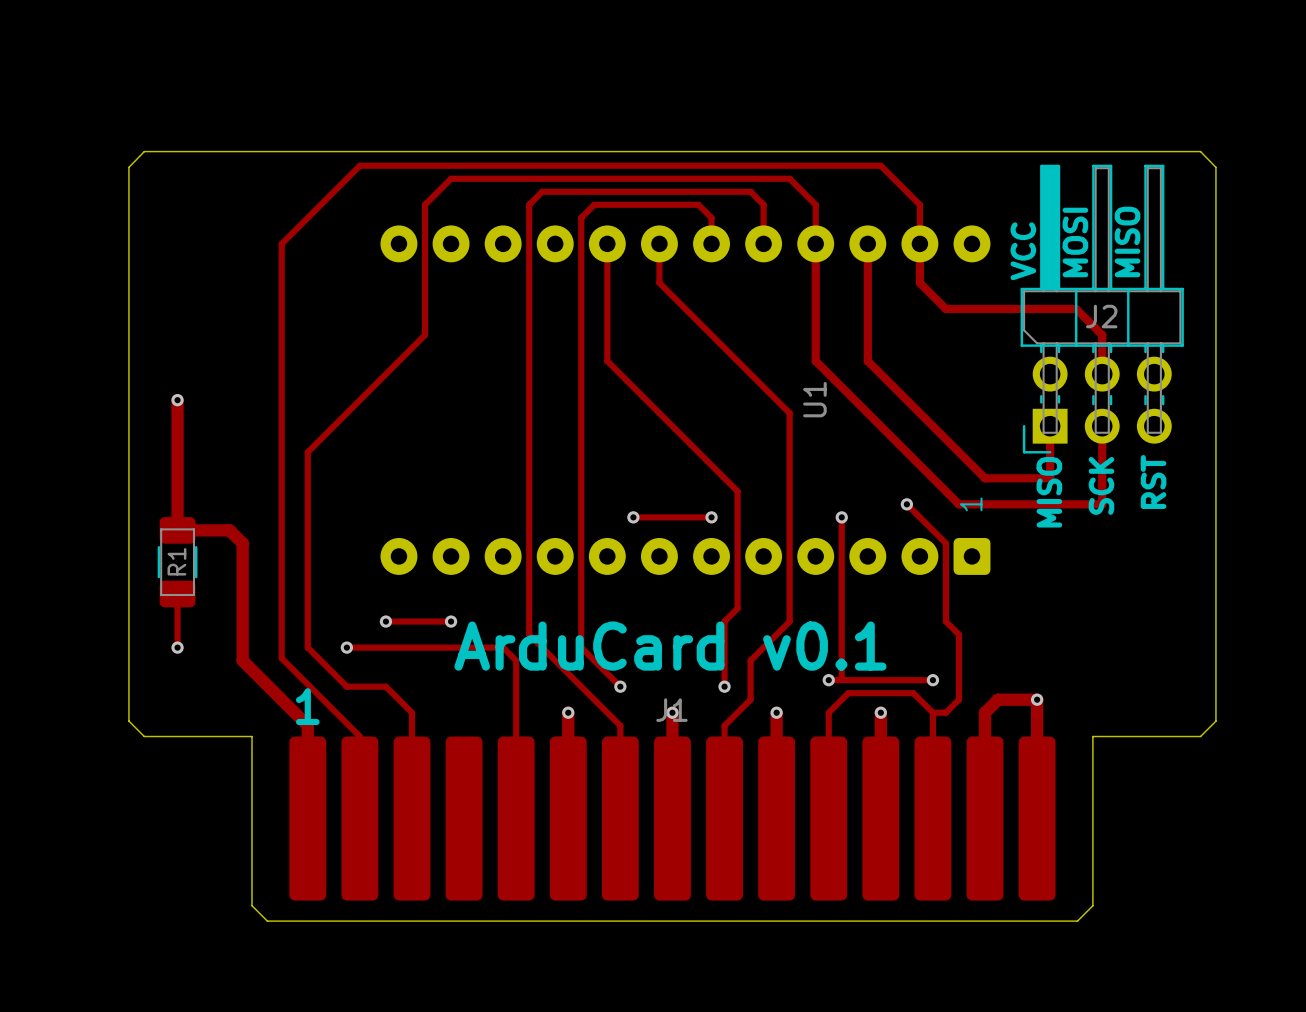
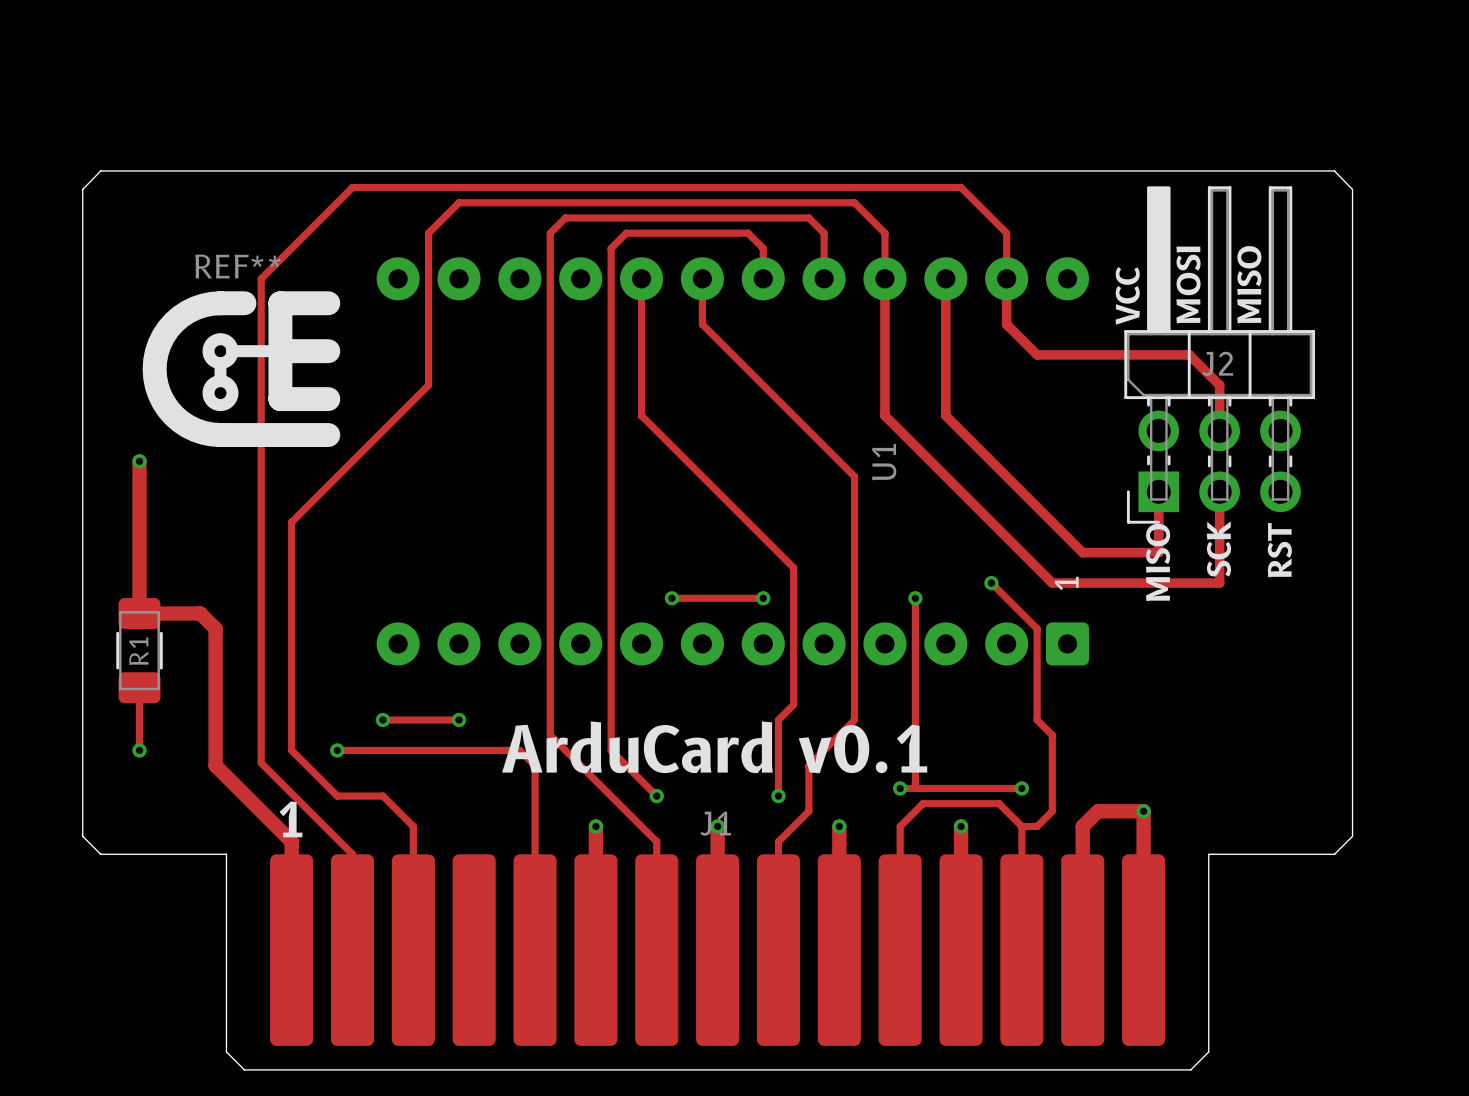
REF**: none -> (241, 369)

